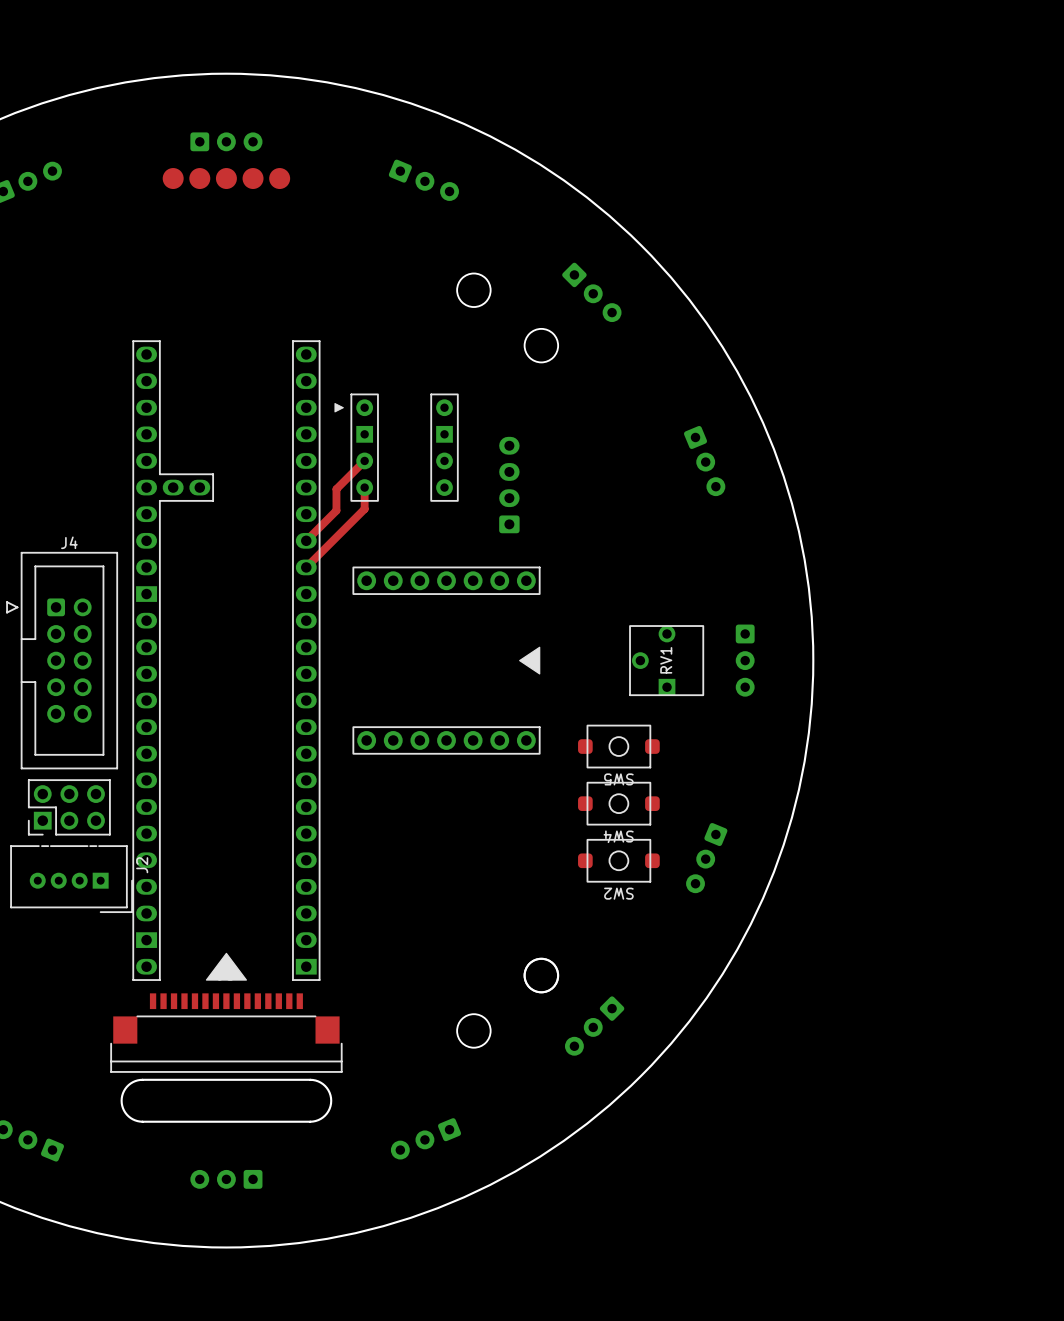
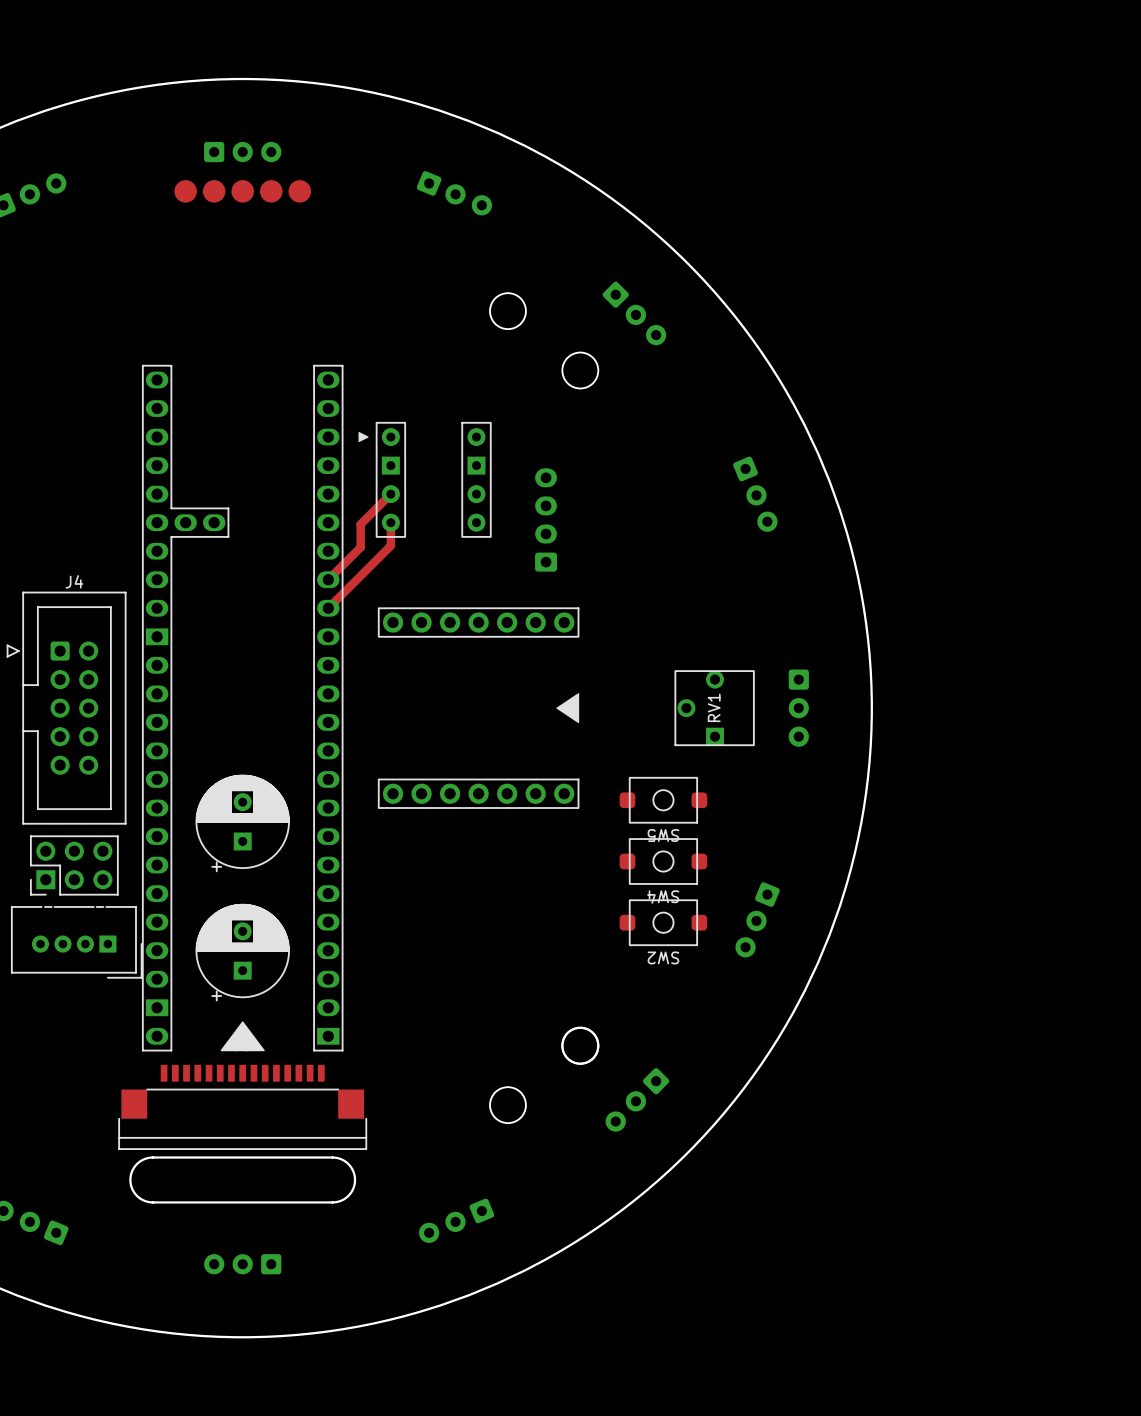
part: none -> (242, 823)
J2 name: J2 (142, 865) -> none
part: none -> (242, 952)

